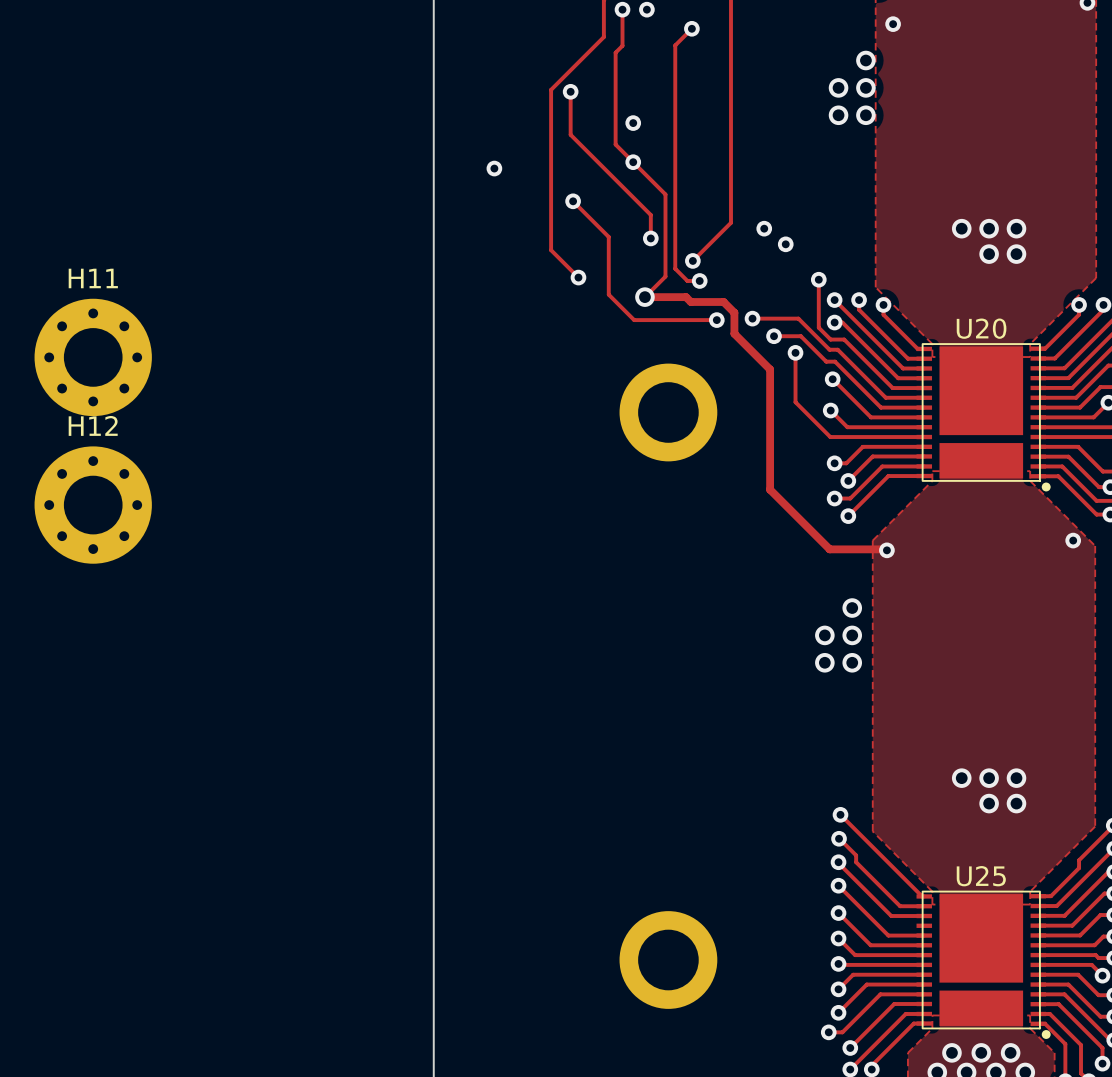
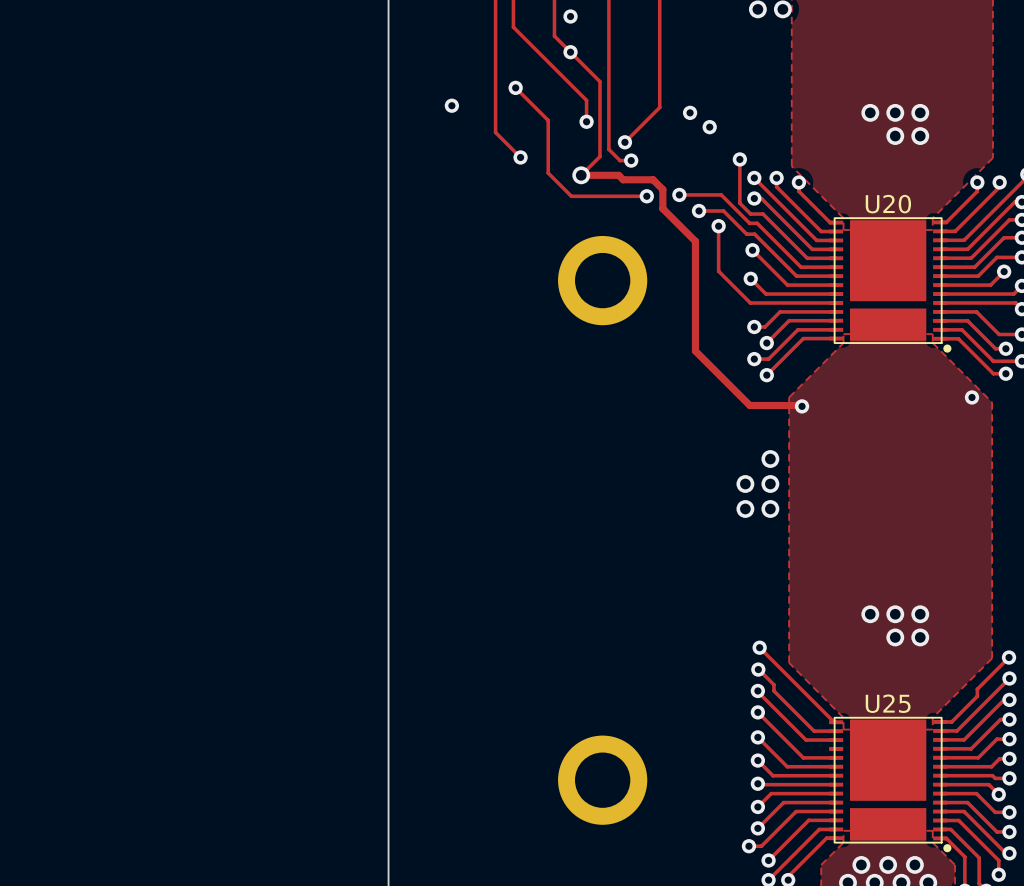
via position: (494, 168) -> (451, 105)
H11: (93, 357) -> none
H12: (93, 505) -> none

